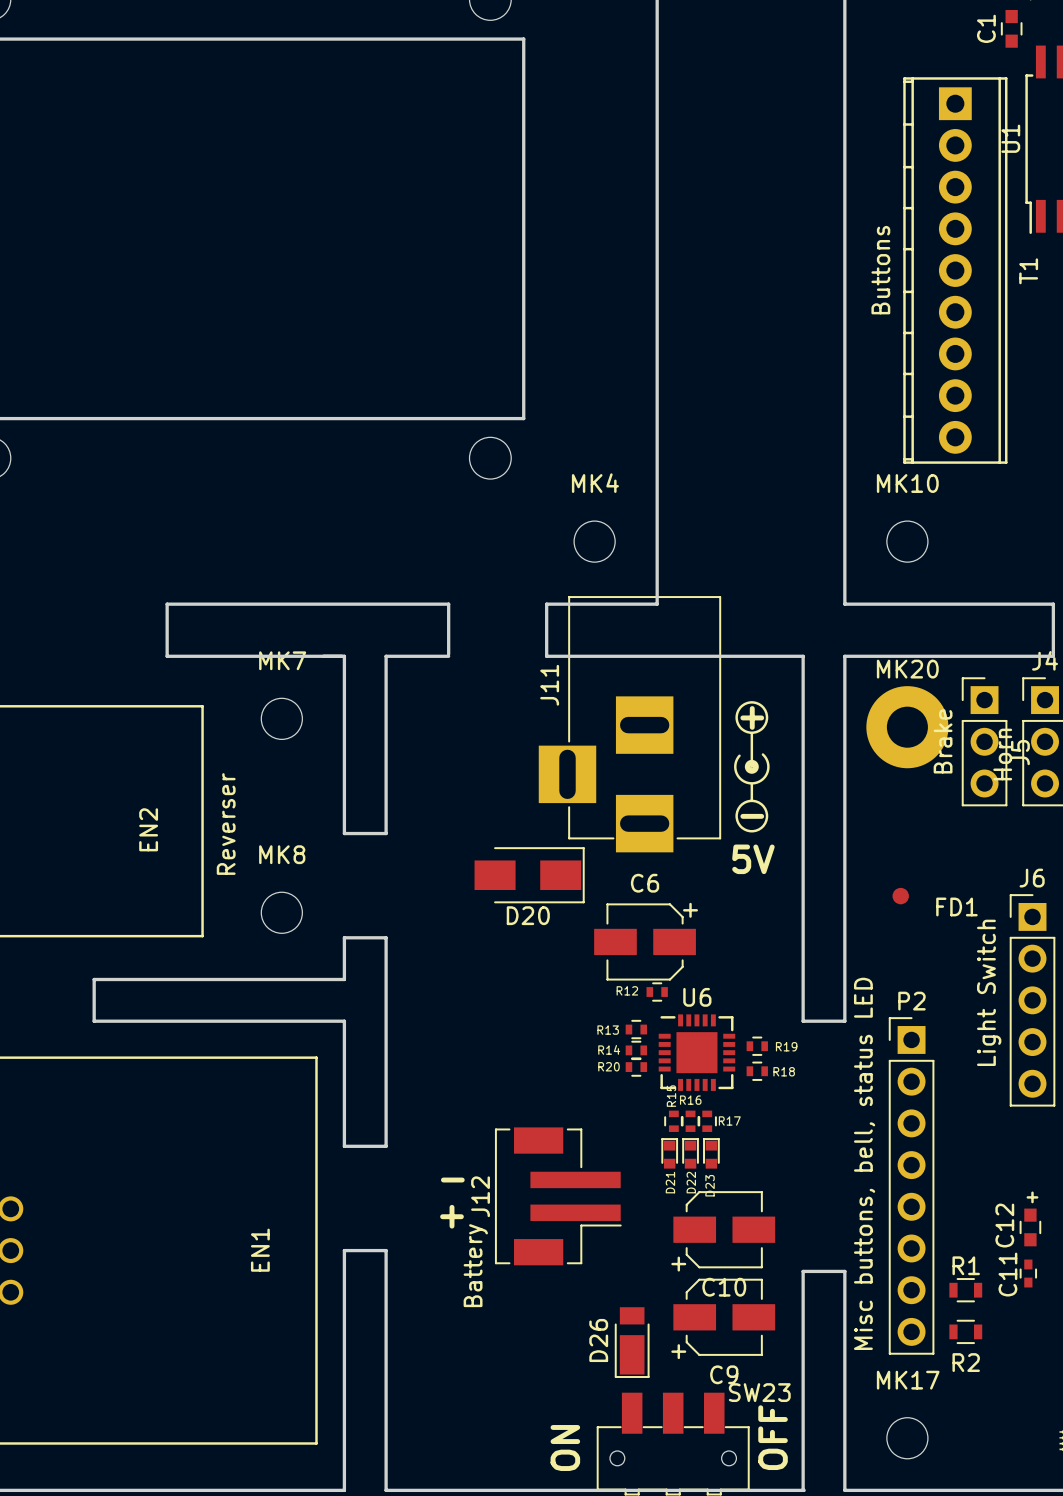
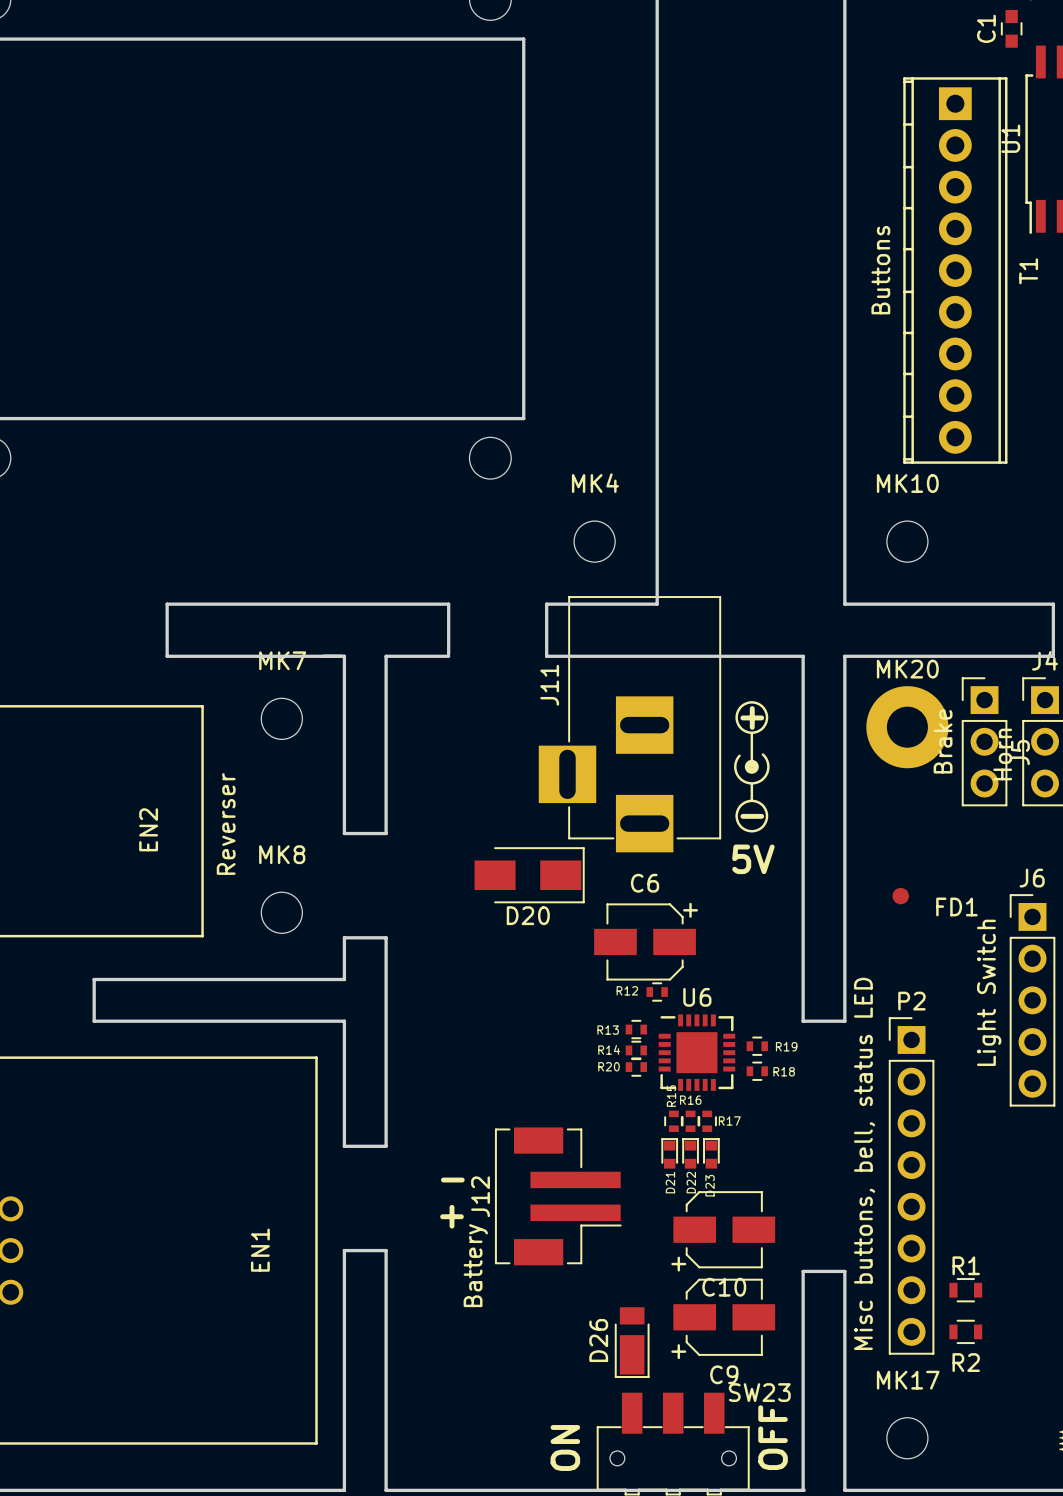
C12: (1030, 1227) -> none
C11: (1028, 1273) -> none

